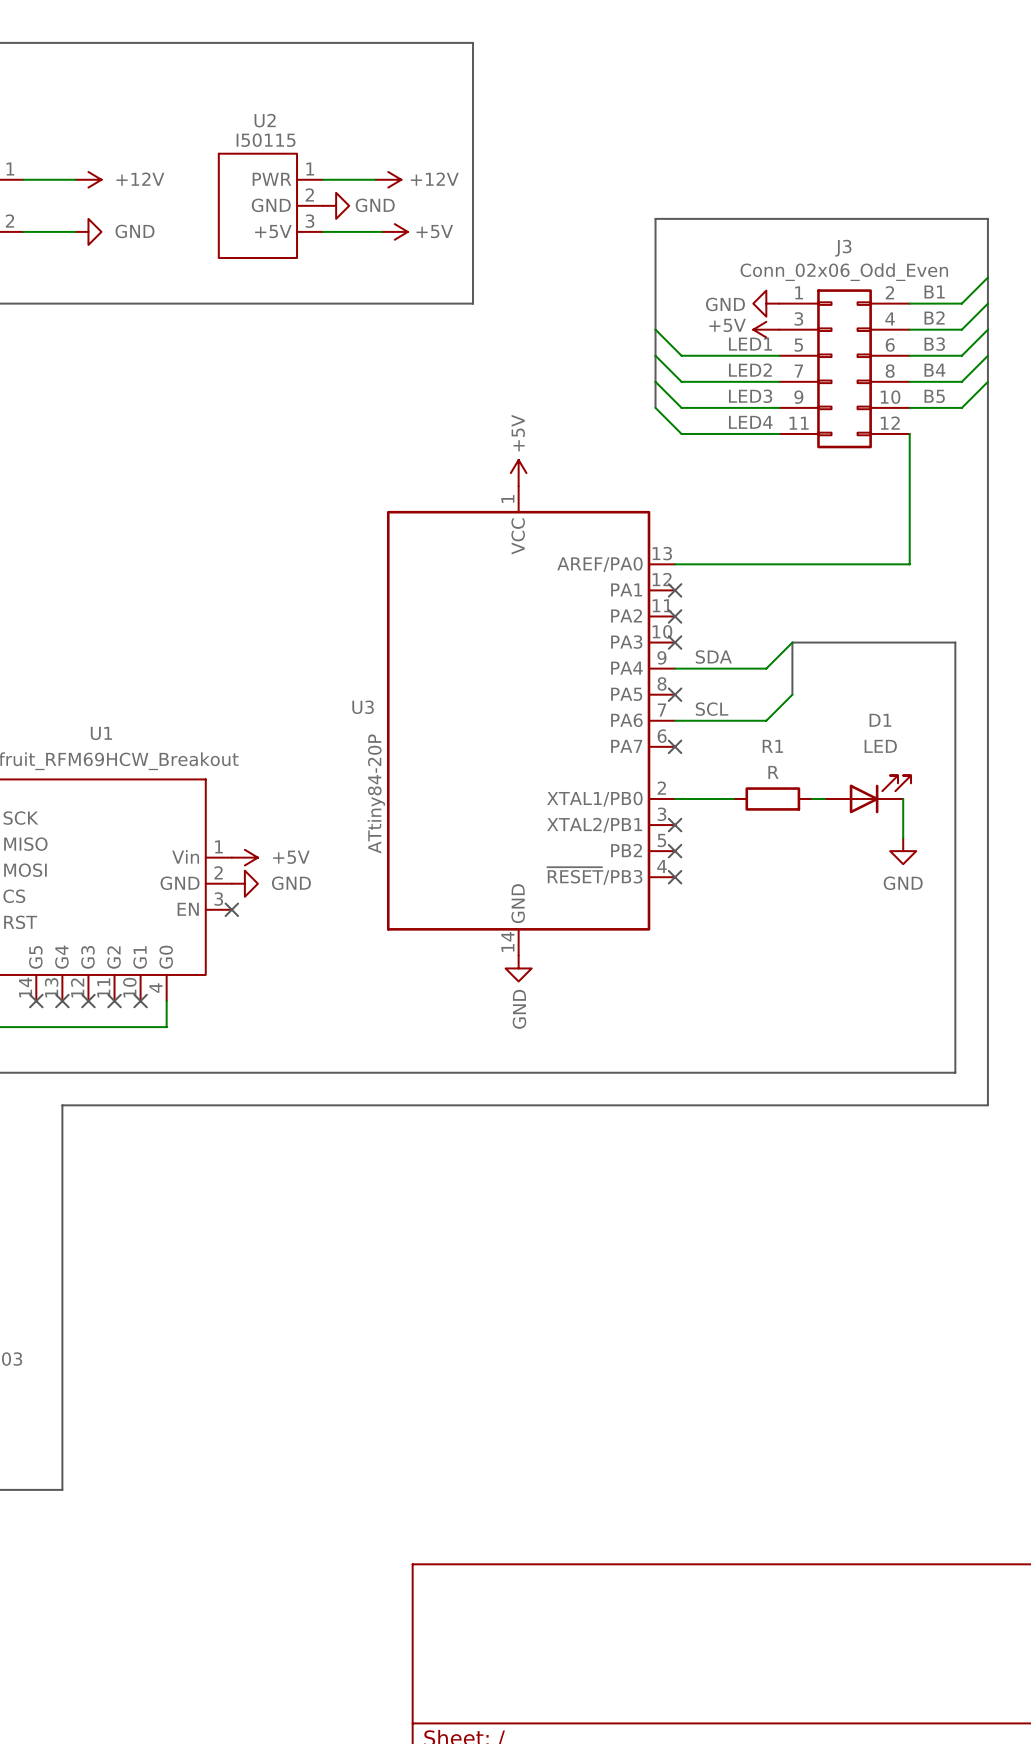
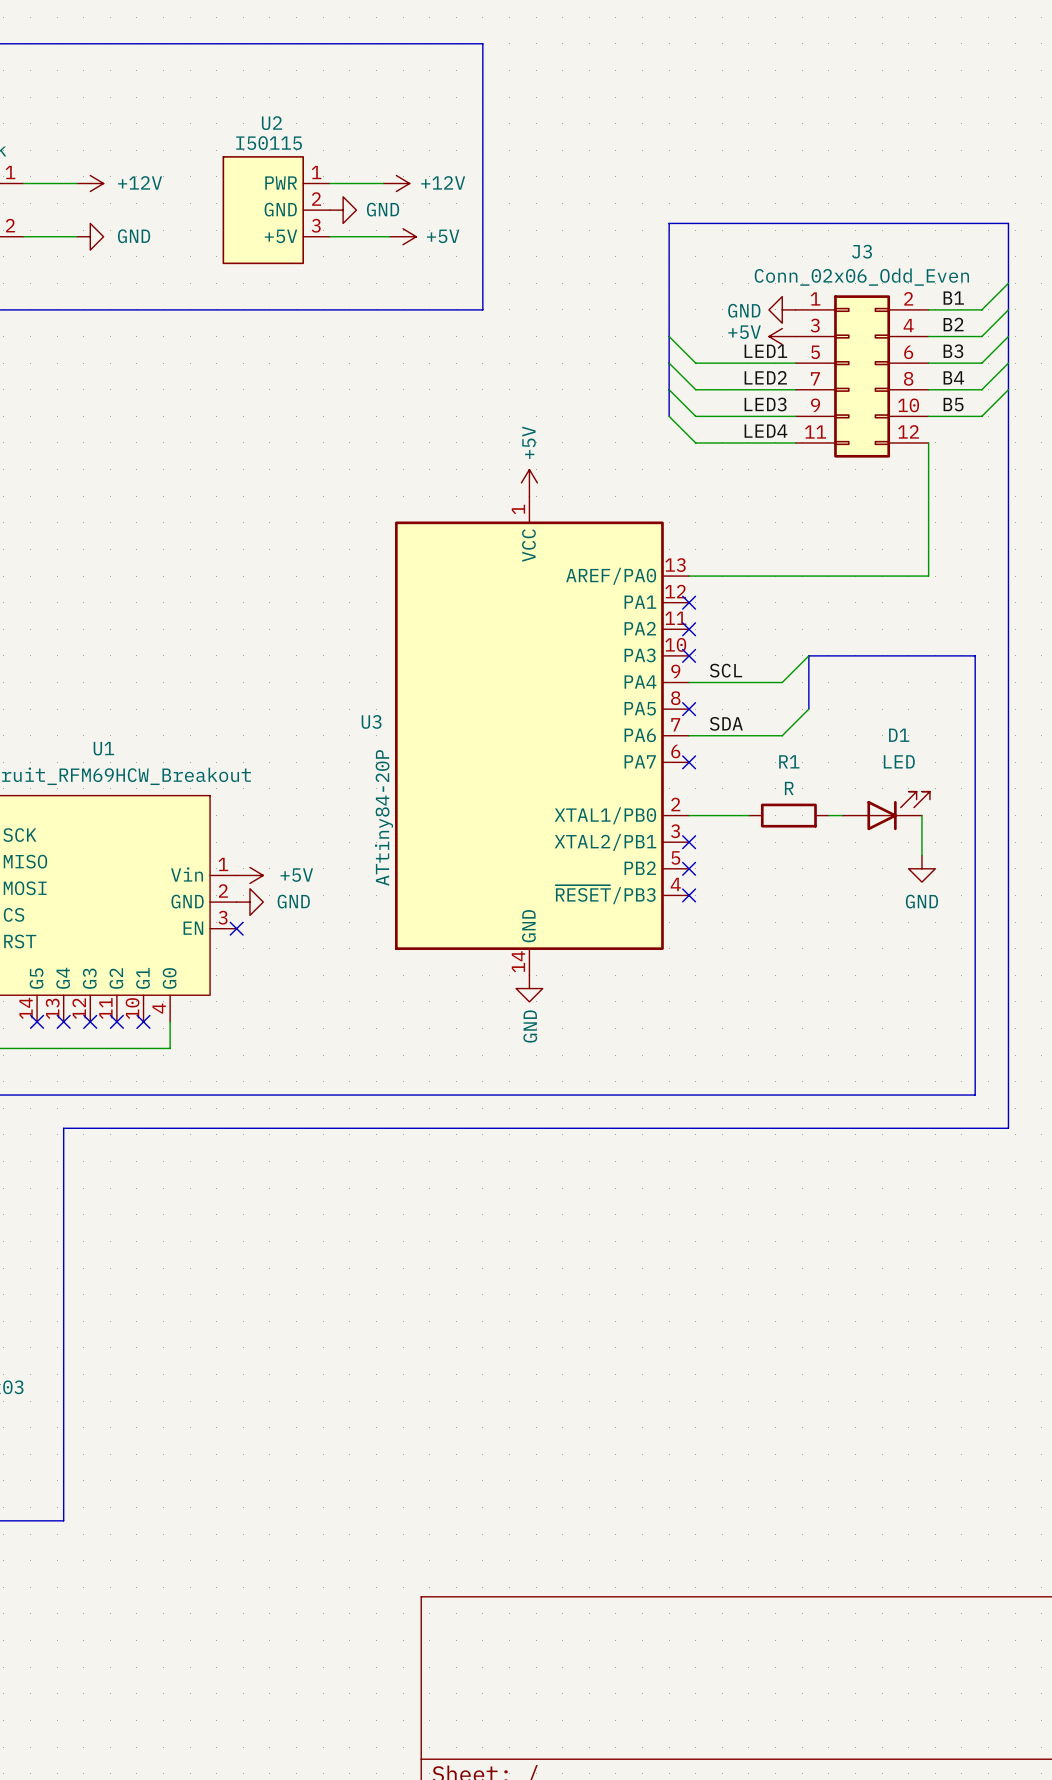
label: SDA (713, 657) -> SCL (726, 670)
label: SCL (712, 709) -> SDA (726, 723)

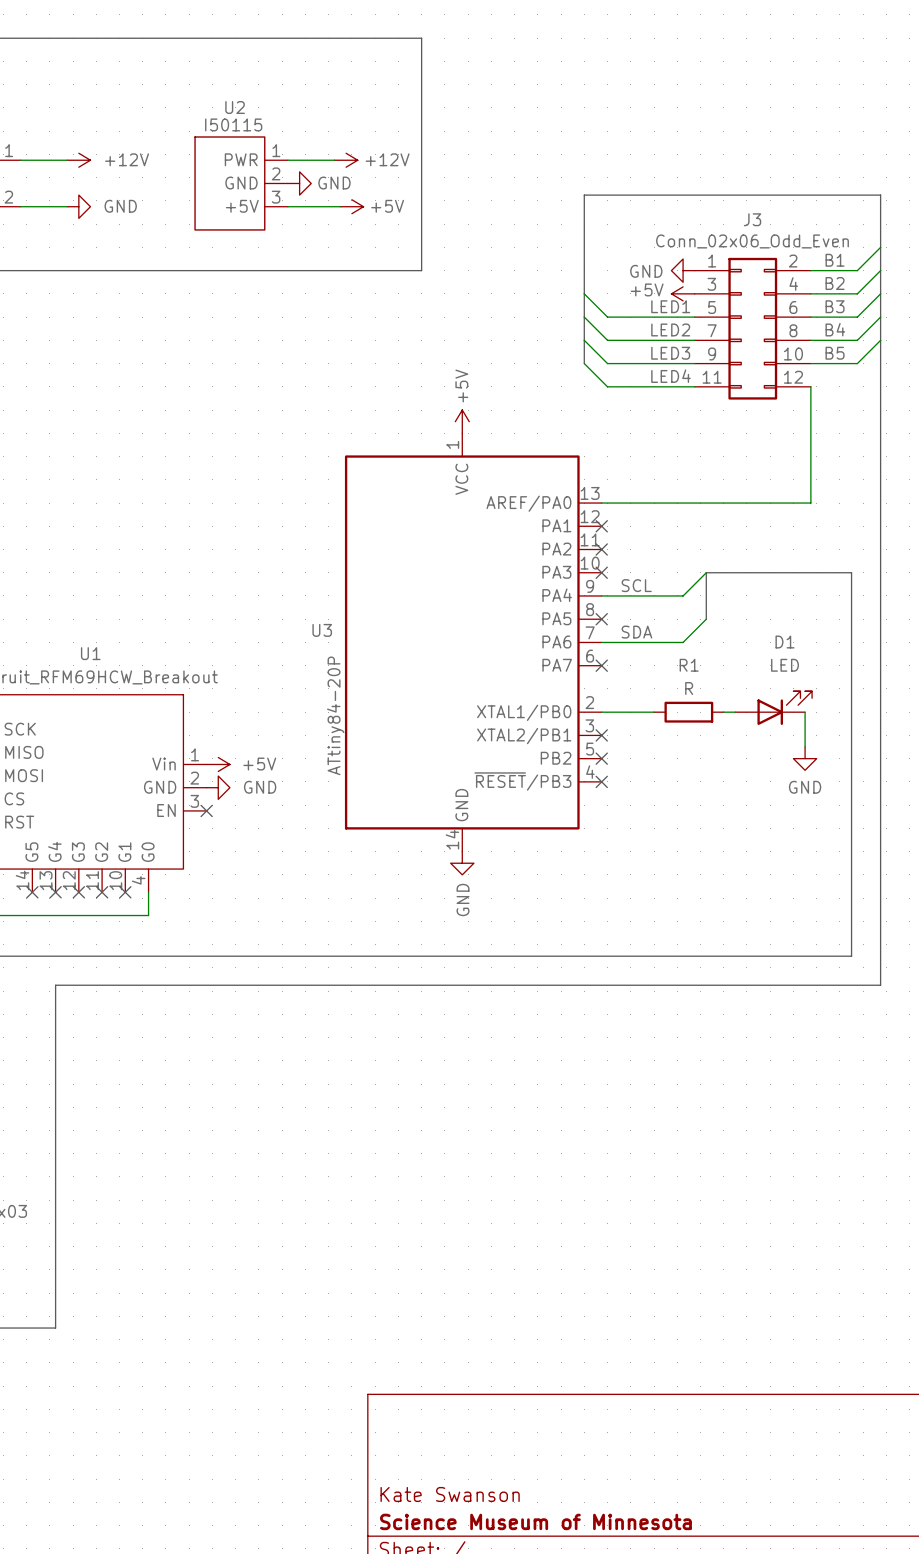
title block: none -> Kate Swanson (450, 1494)
title block: none -> Science Museum of Minnesota (535, 1521)

